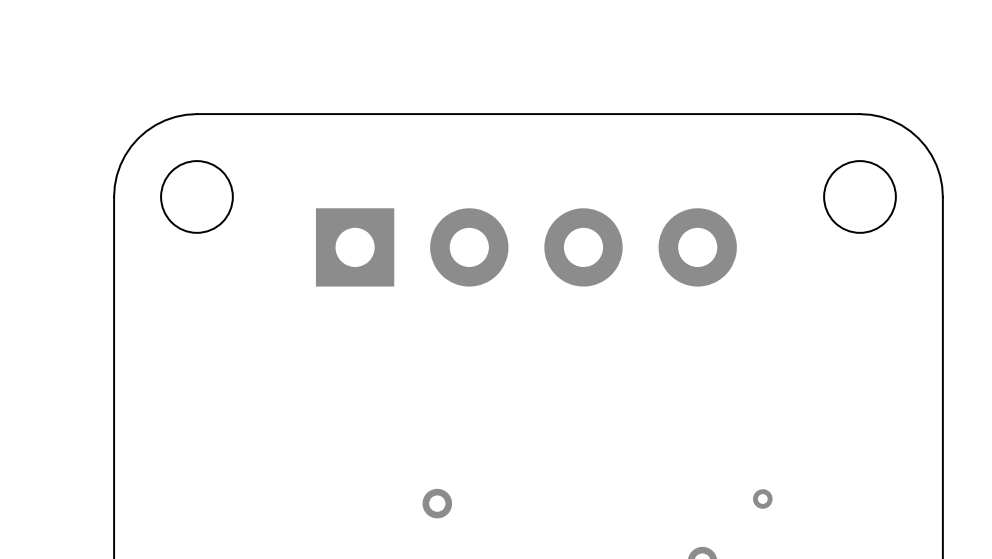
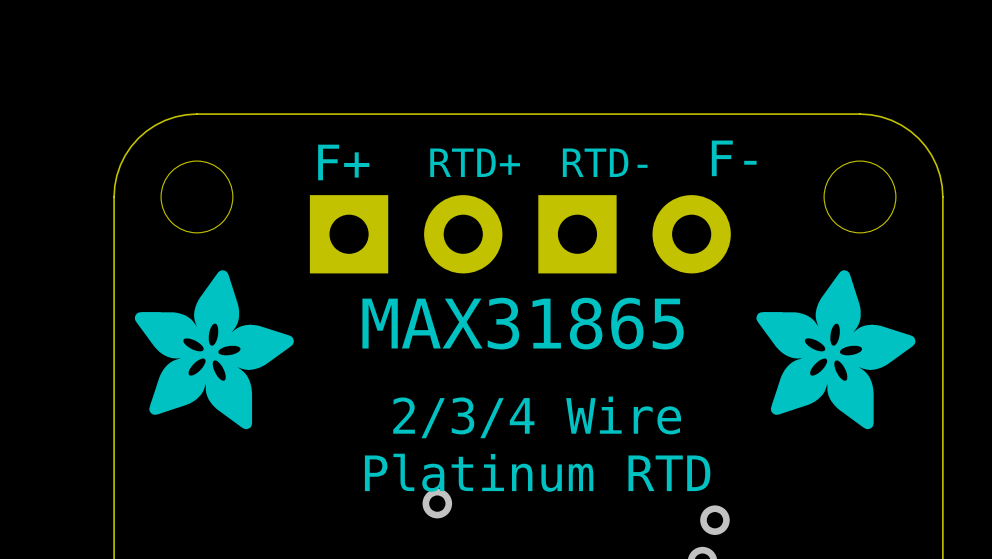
text: none -> F- (734, 158)
text: none -> F+ (343, 162)
text: none -> RTD+ (475, 162)
text: none -> RTD- (605, 162)
part: none -> (406, 234)
part: none -> (634, 234)
part: (526, 247) -> none
drawing: none -> [134, 270, 294, 430]
drawing: none -> [756, 270, 916, 430]
text: none -> MAX31865 (523, 323)
text: none -> 2/3/4 Wire (537, 417)
text: none -> Platinum RTD (537, 472)
via: (762, 499) -> none
via: none -> (714, 520)

